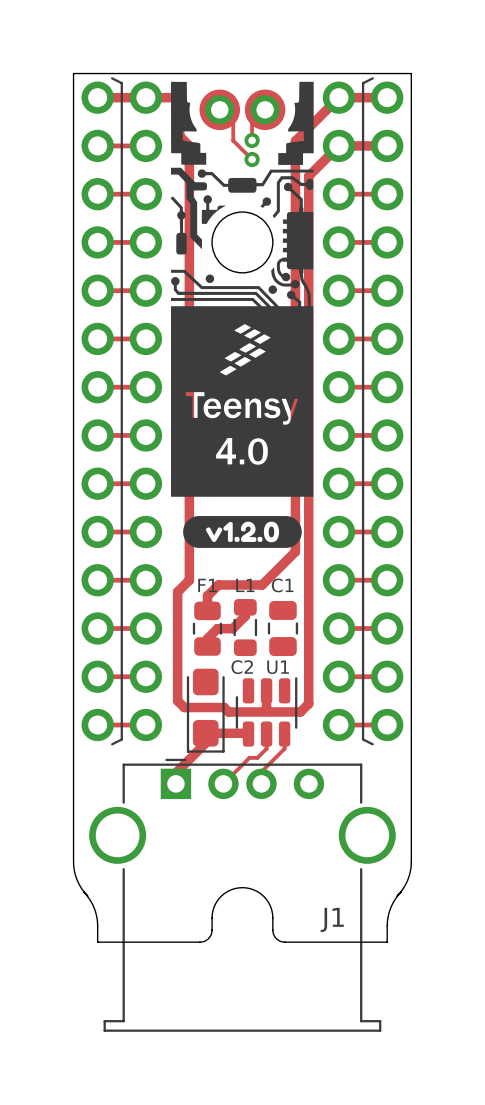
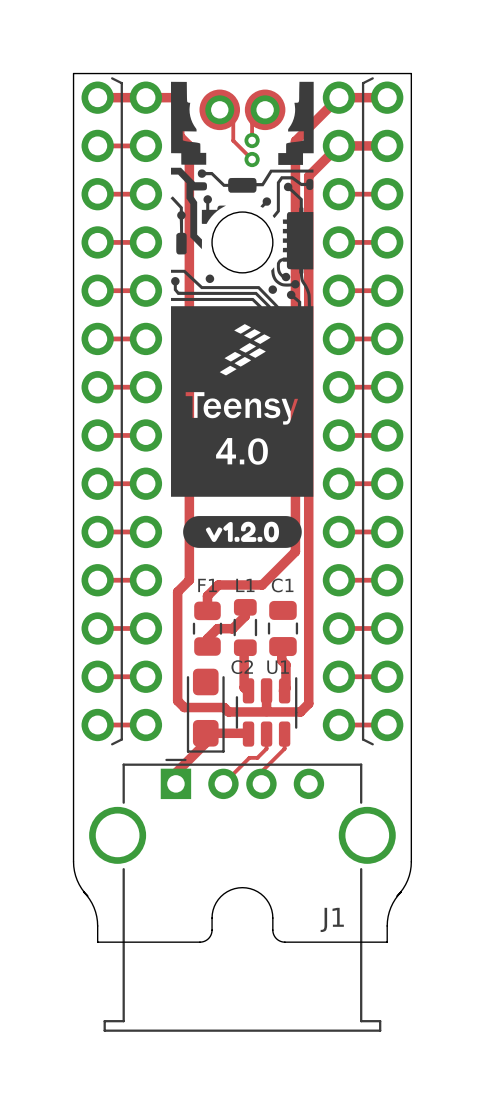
track: none -> (281, 646) (281, 660) (285, 664) (285, 688) (283, 690)
track: none -> (244, 647) (244, 687) (247, 690)

